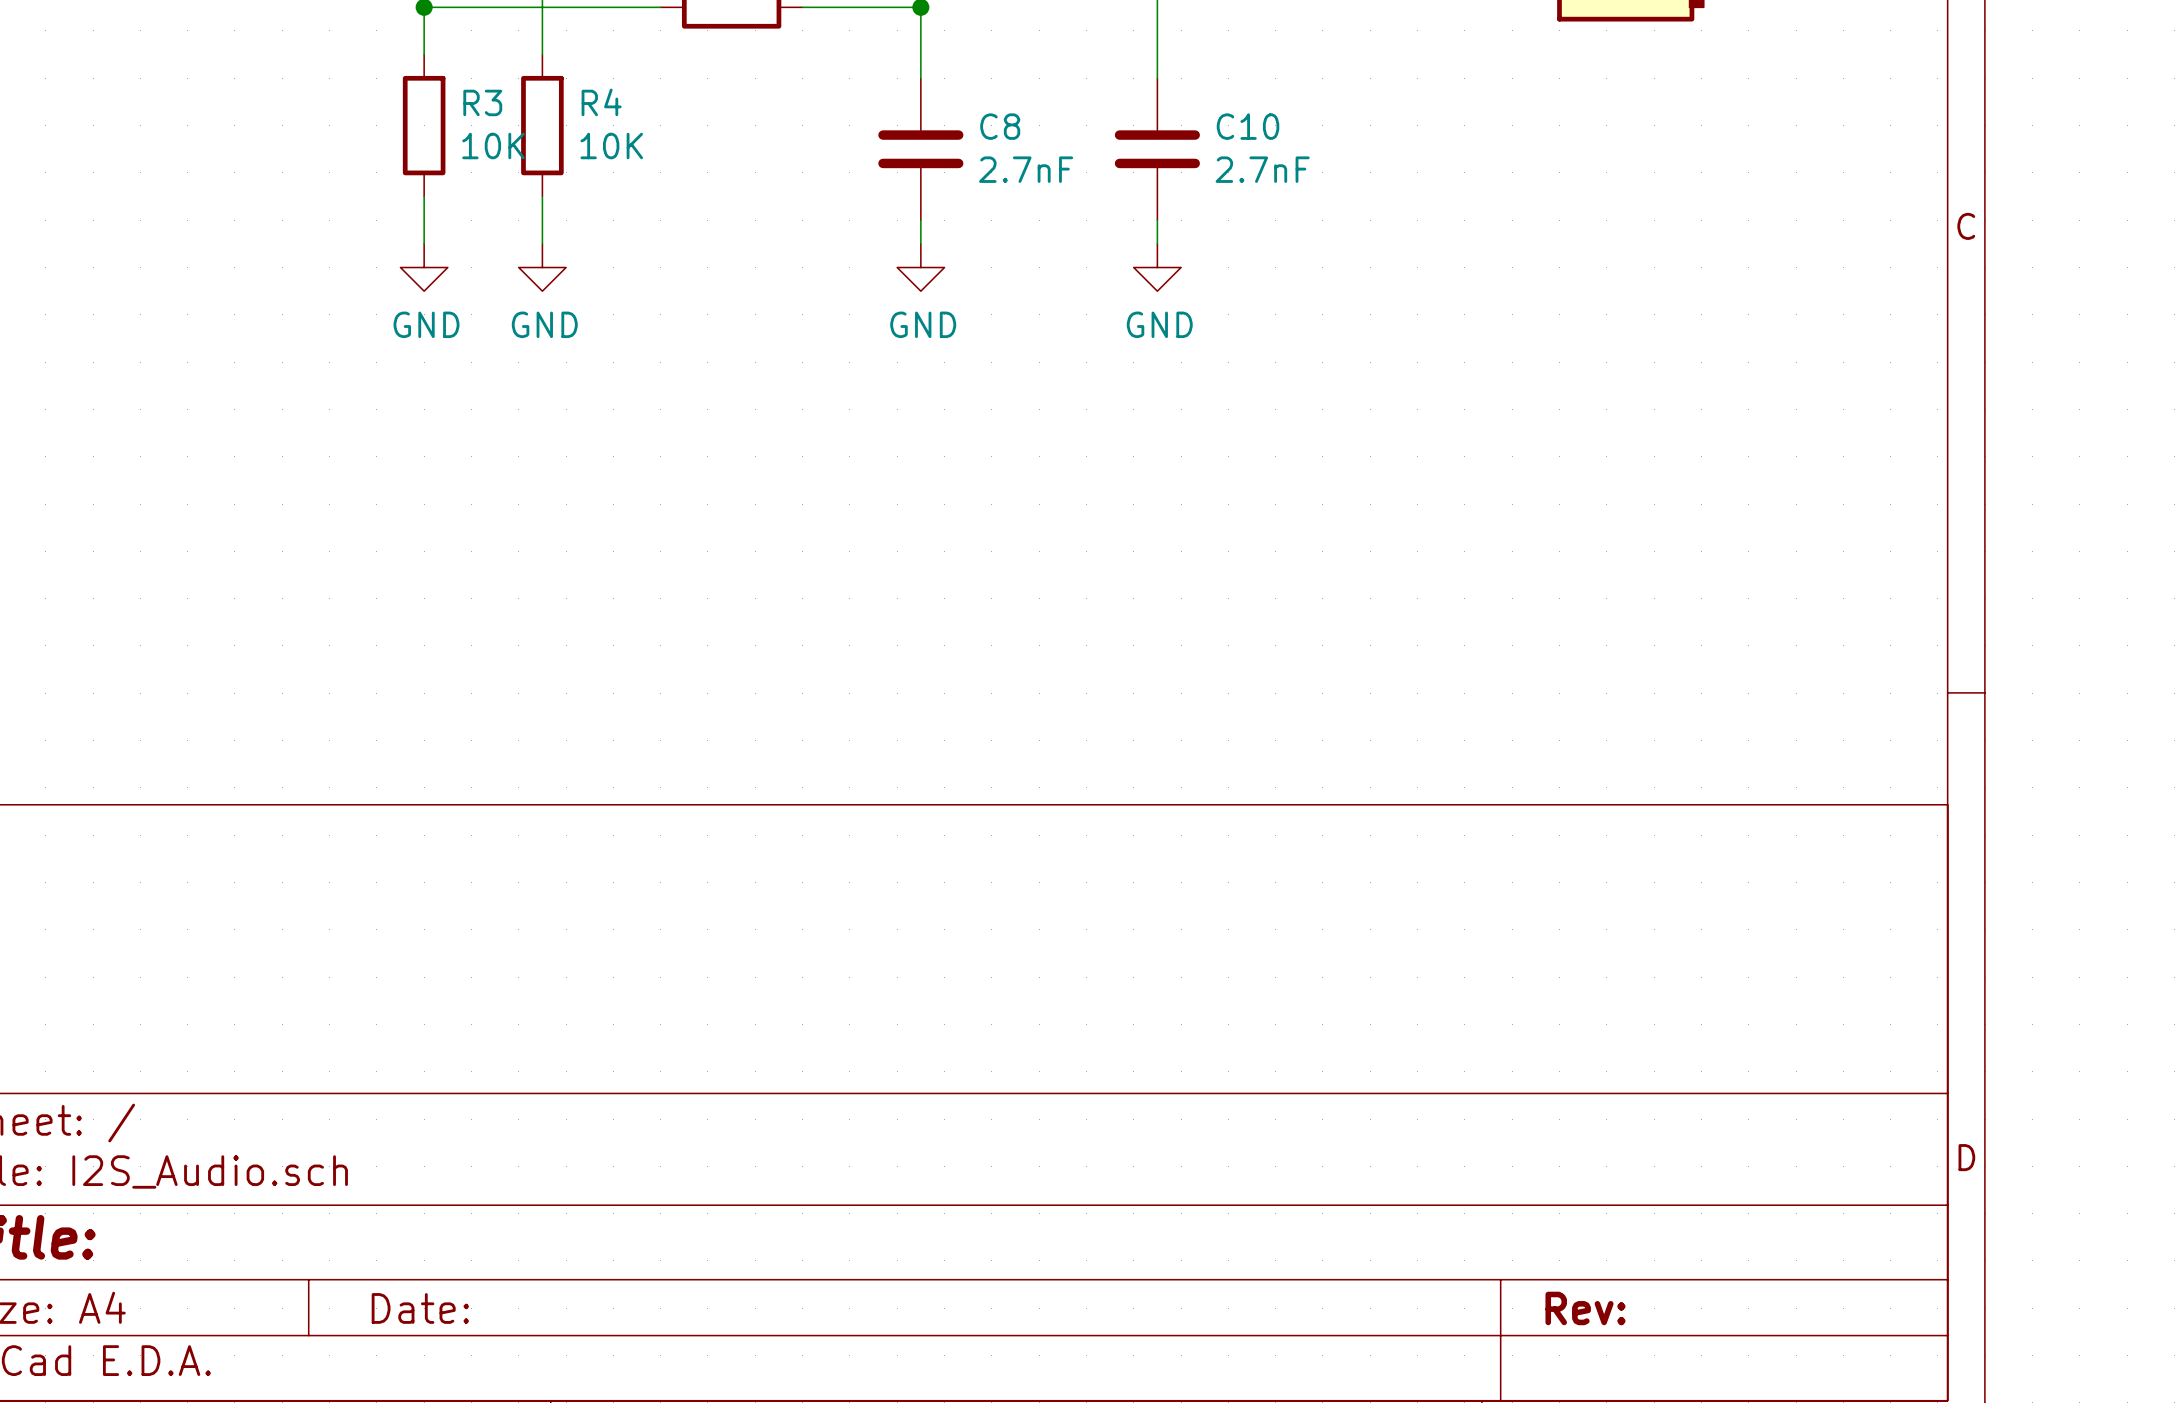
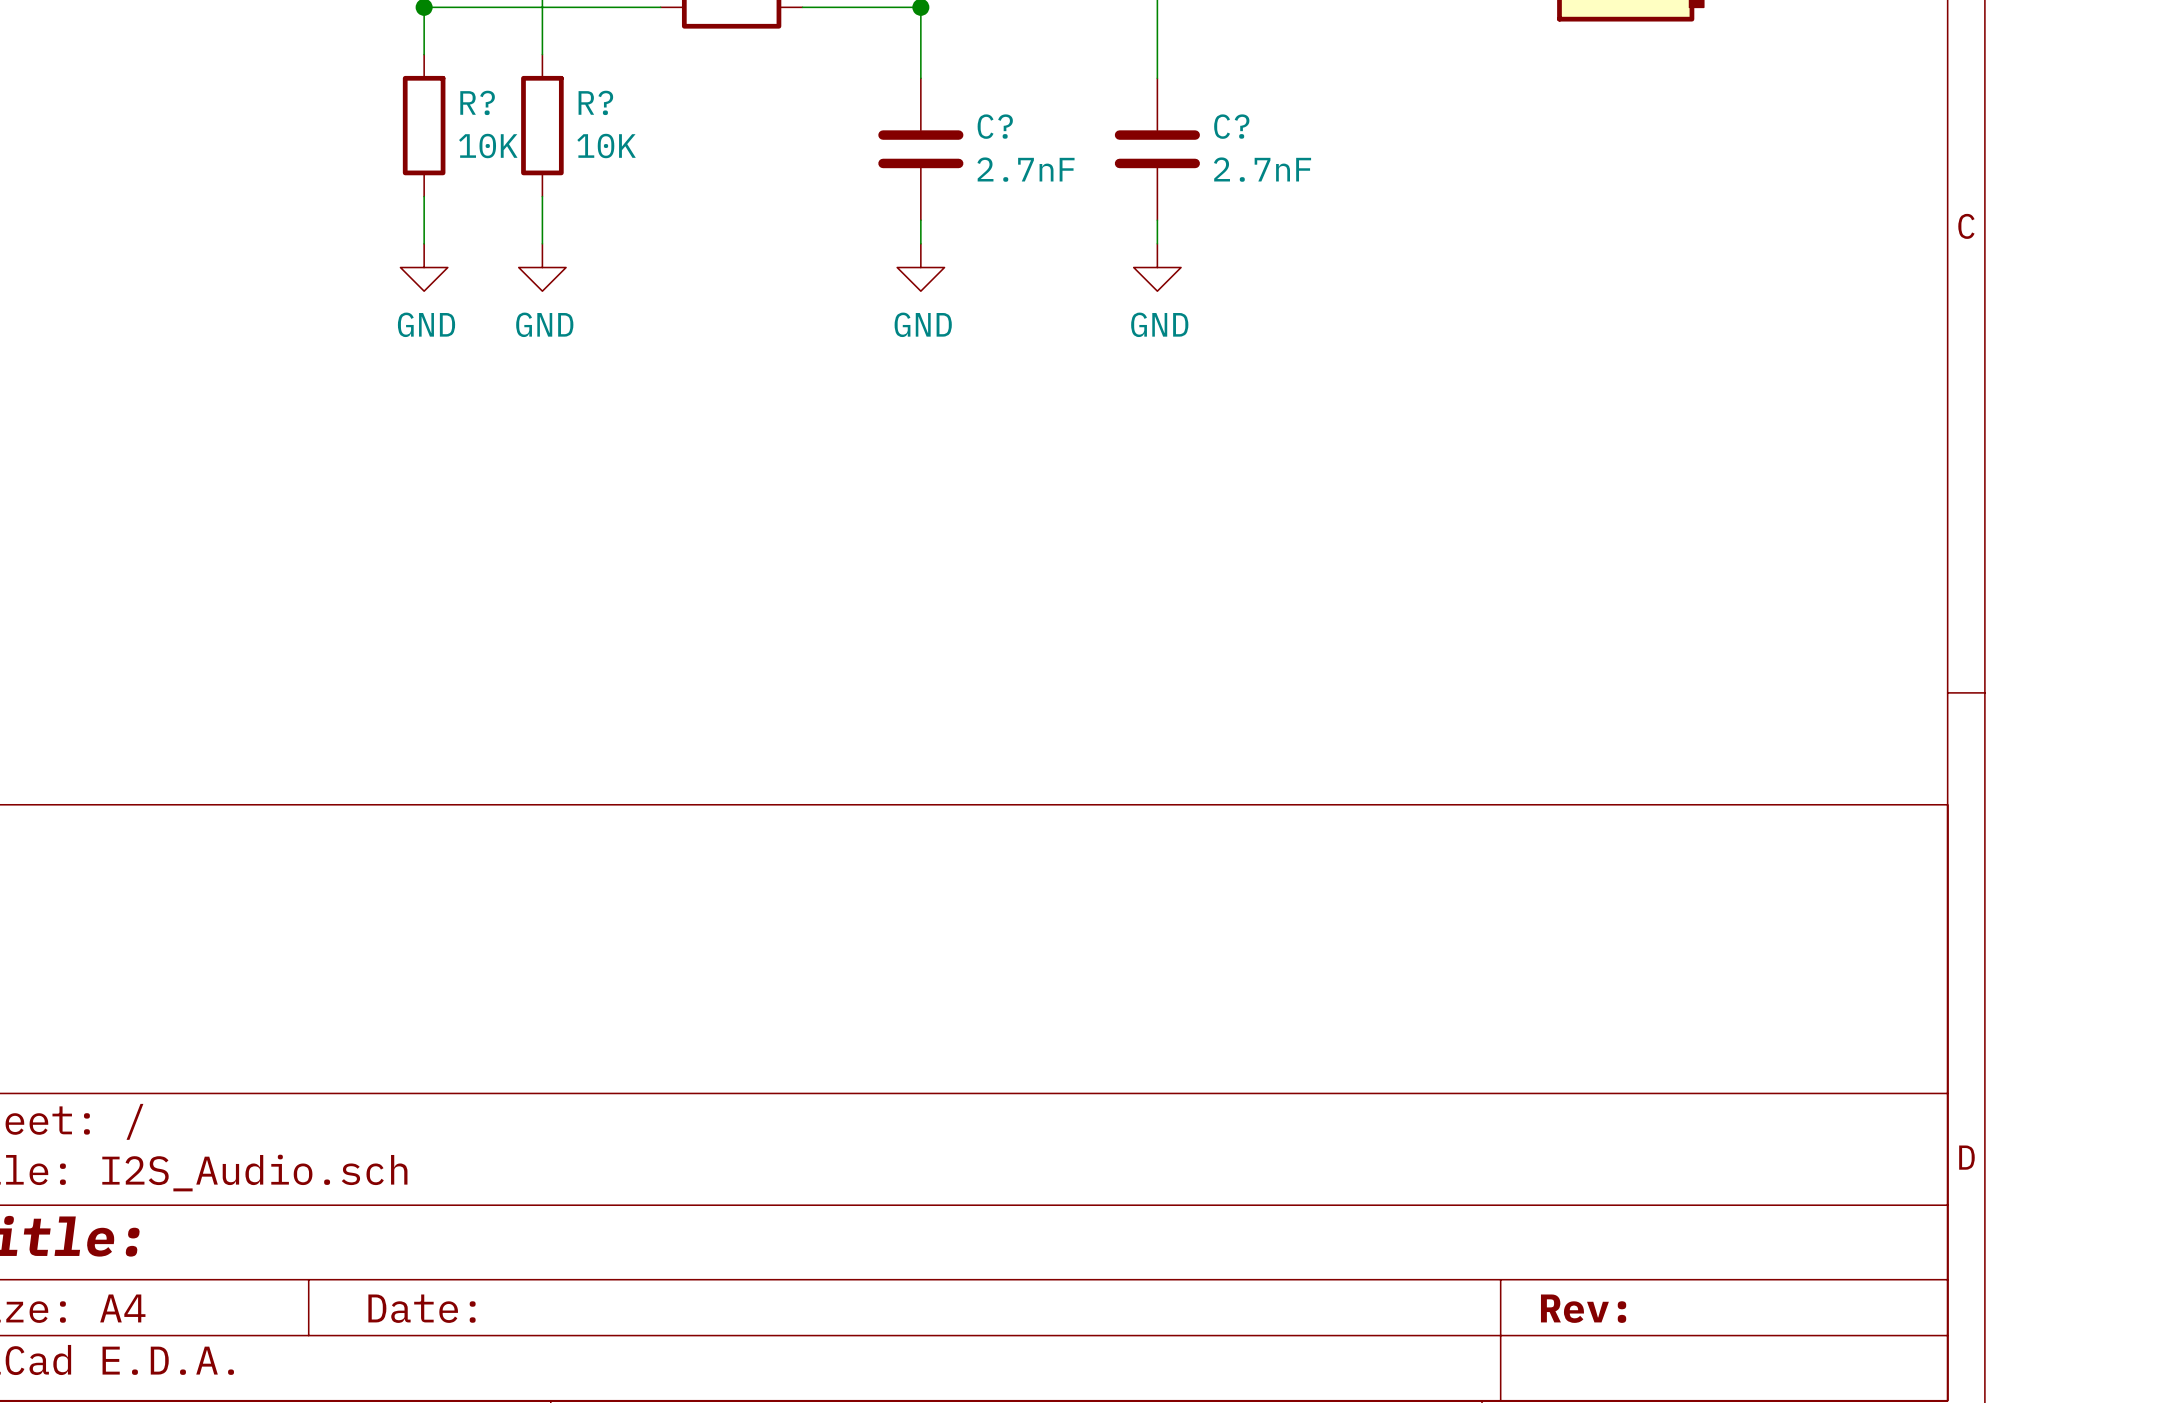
R3 name: R3 (482, 102) -> R? (477, 102)
R4 name: R4 (601, 102) -> R? (595, 102)
C8 name: C8 (1000, 126) -> C? (995, 126)
C10 name: C10 (1248, 126) -> C? (1231, 126)

